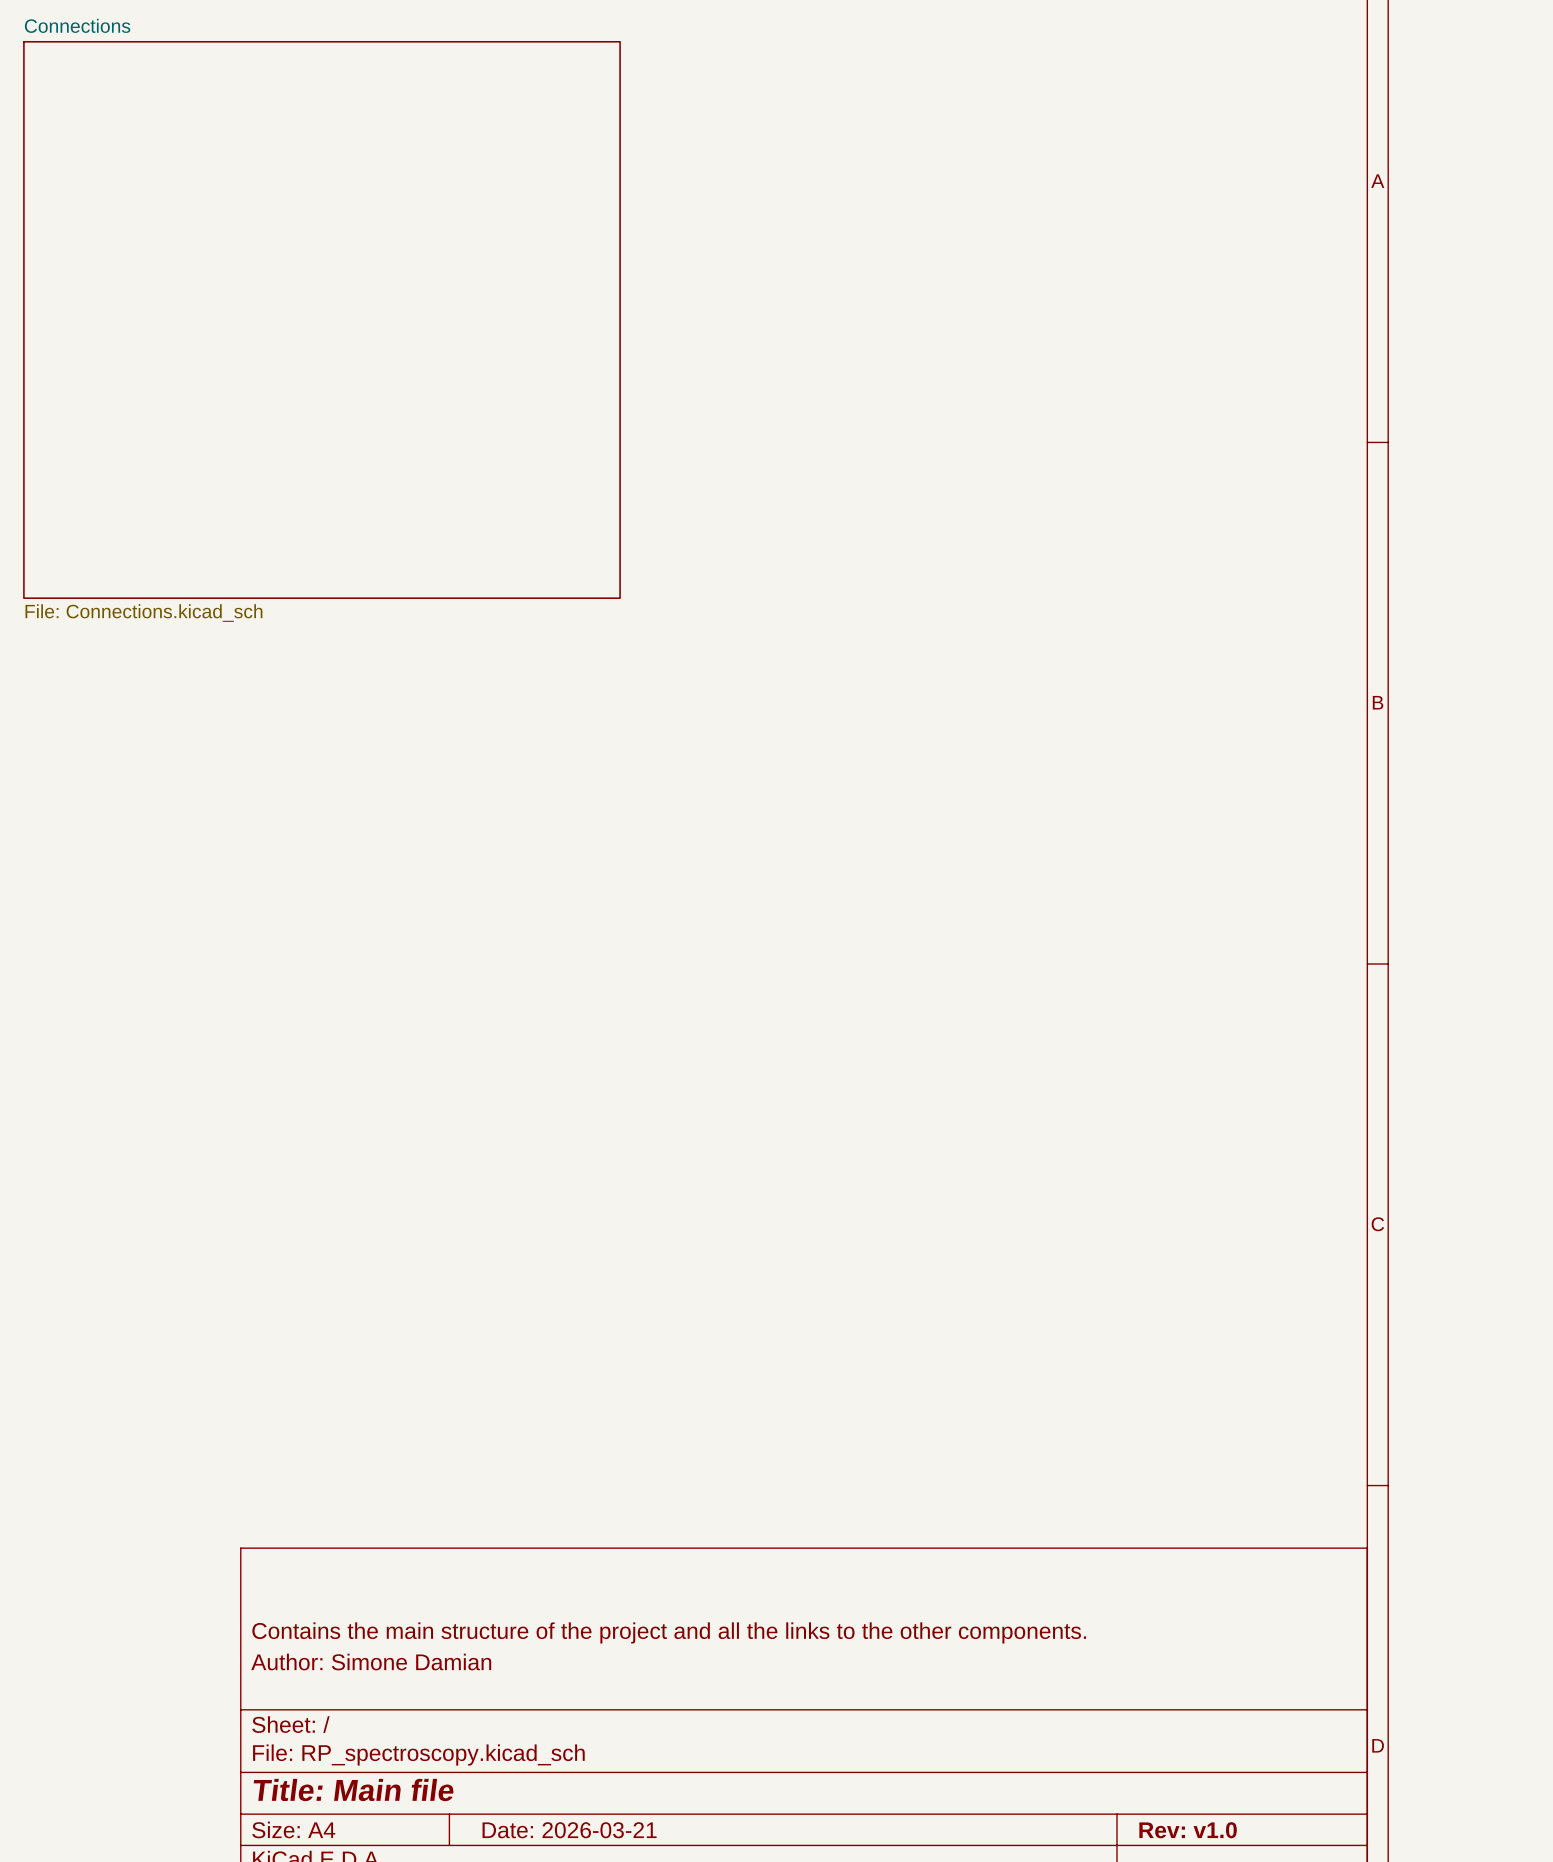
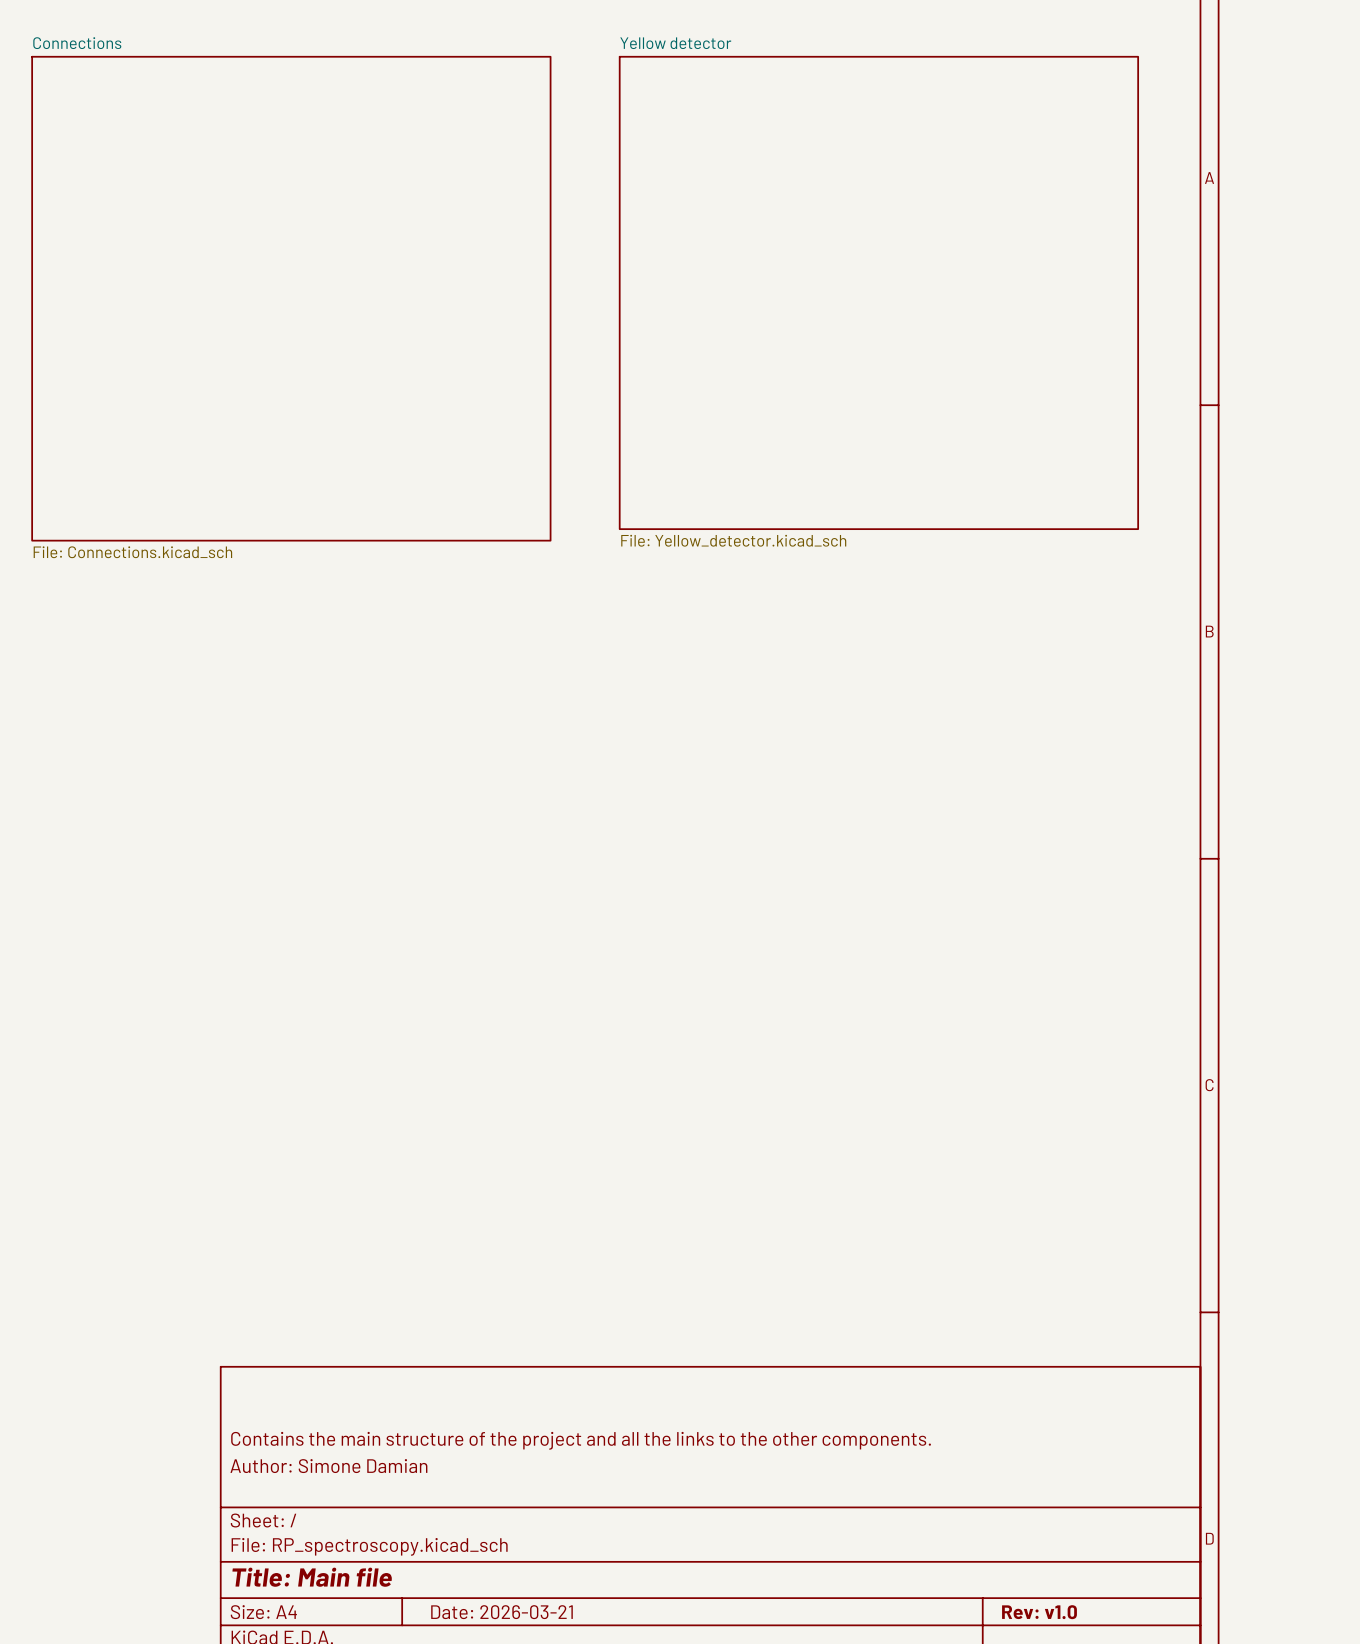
sheet Yellow detector: none -> File: Yellow_detector.kicad_sch (878, 292)

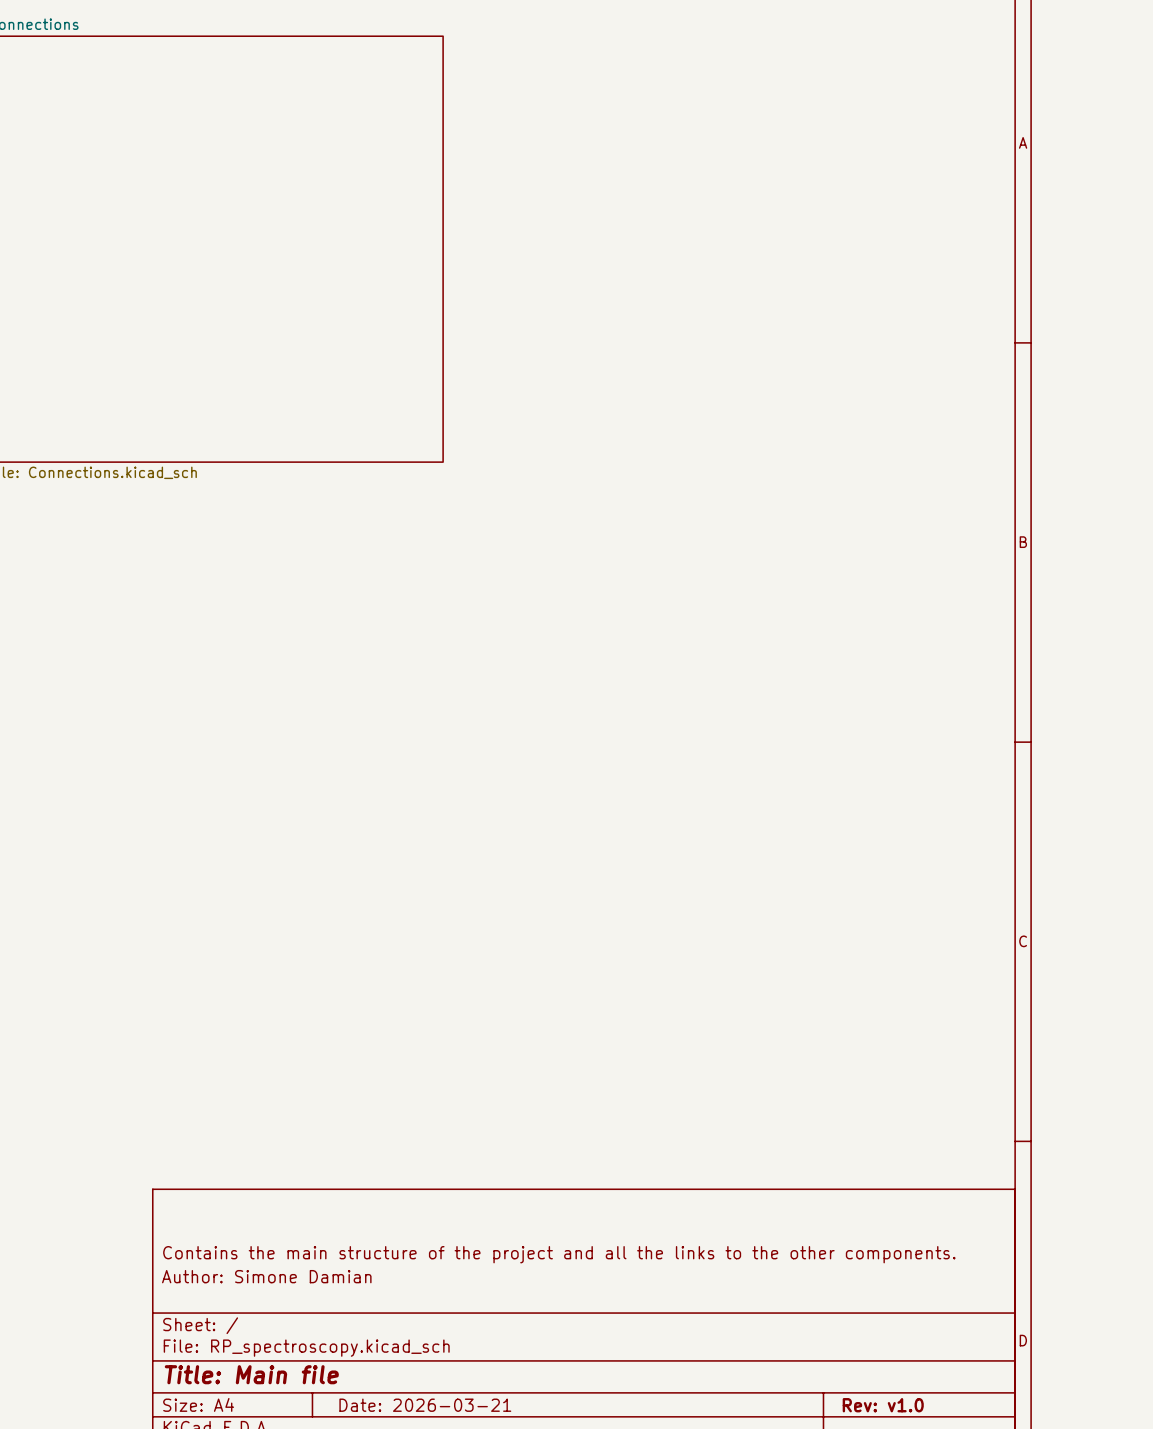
sheet Yellow detector: File: Yellow_detector.kicad_sch (878, 292) -> none

